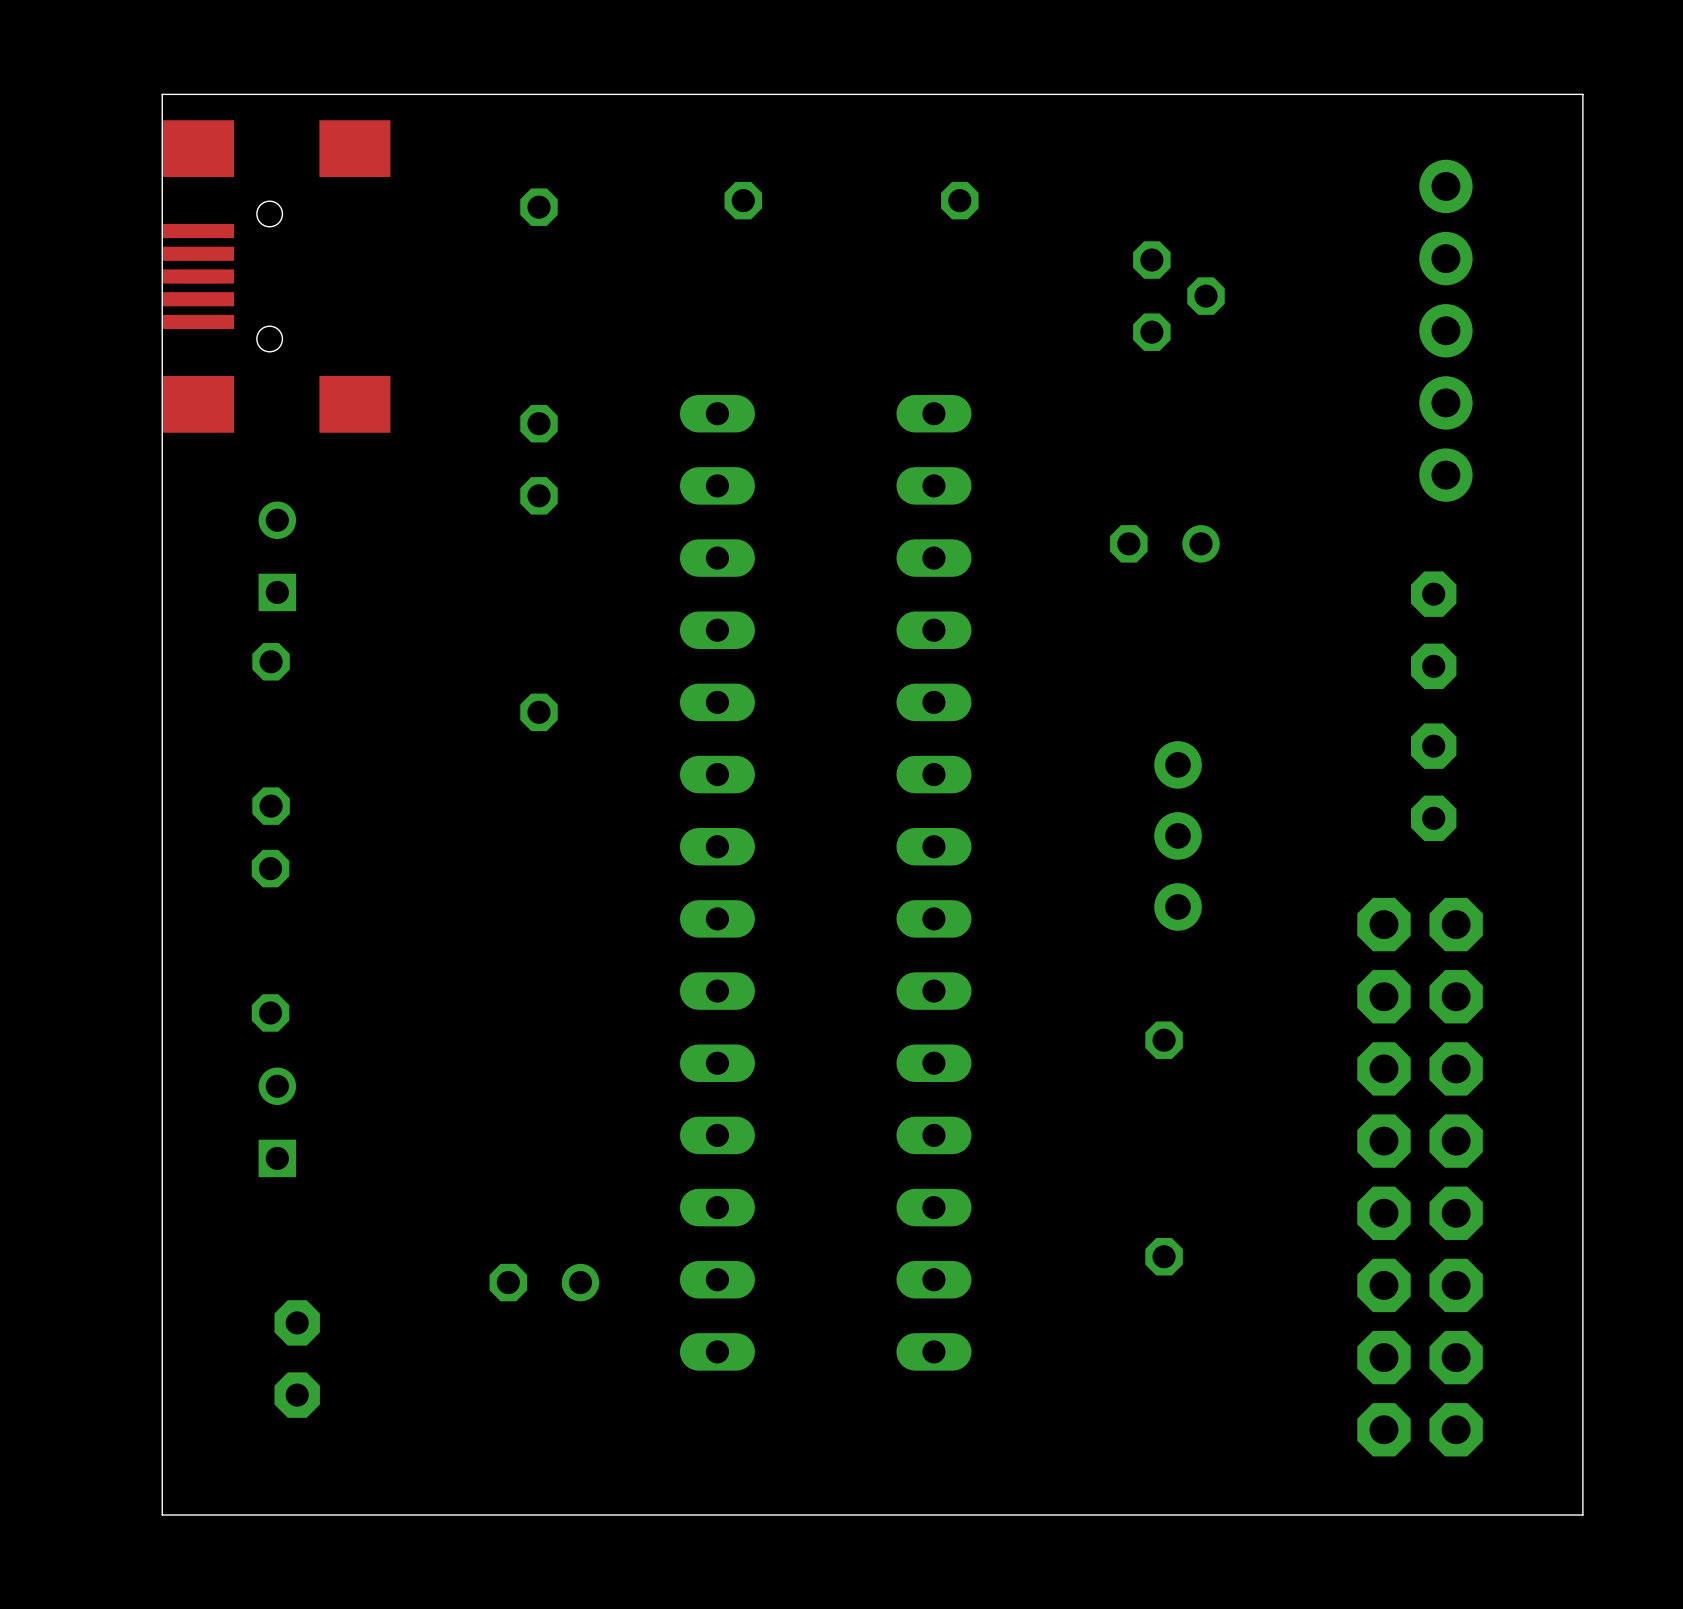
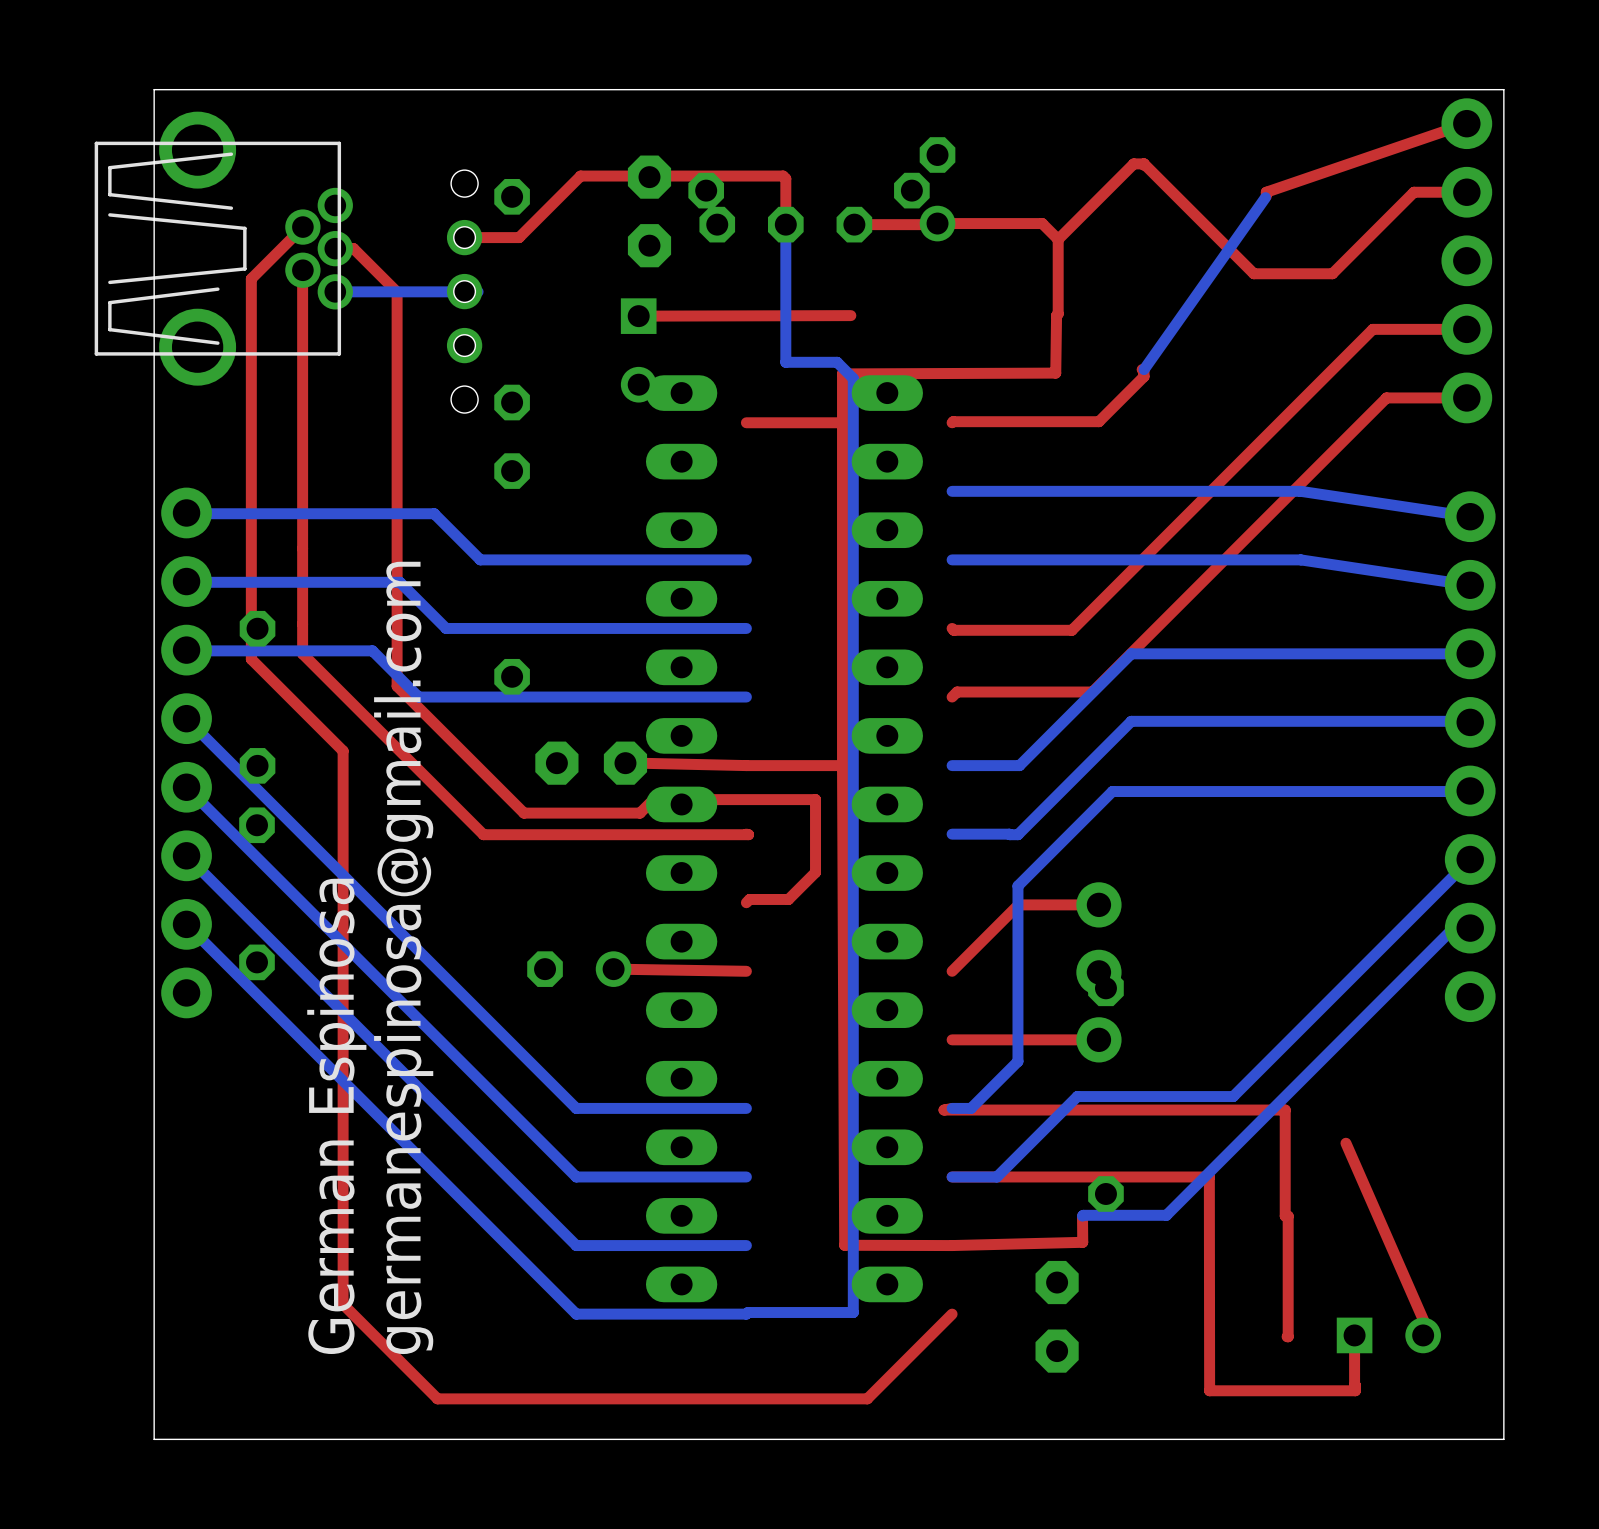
top track: none -> (1466, 123) (1266, 192) (1266, 196)
top track: none -> (1144, 163) (1253, 273) (1332, 273) (1413, 192) (1466, 192)
top track: none -> (1144, 163) (1133, 163) (1058, 239)
part: none -> (937, 189)
bottom track: none -> (1265, 197) (1144, 369)
part: none -> (649, 211)
top track: none -> (785, 224) (785, 178) (783, 176) (580, 176) (519, 237) (464, 237)
bottom track: none -> (785, 224) (785, 362) (837, 362) (853, 378) (853, 1312) (576, 1314) (186, 924)
part: none -> (785, 224)
top track: none -> (854, 224) (1042, 223) (1058, 239)
top track: none -> (302, 227) (251, 278) (251, 659) (343, 751) (343, 1304) (437, 1398) (867, 1398) (952, 1314)
top track: none -> (1058, 239) (1055, 373) (842, 373) (842, 765)
part: none -> (223, 248)
top track: none -> (335, 248) (353, 248) (397, 292) (397, 686) (523, 813) (640, 813) (653, 799) (815, 799) (815, 872) (788, 899) (749, 899) (746, 902)
part: (276, 276) -> none
top track: none -> (302, 270) (302, 653) (483, 834) (748, 834) (746, 834)
part: (1178, 296) -> none
part: none -> (464, 291)
bottom track: none -> (478, 291) (335, 291)
part position: (1445, 330) -> (1466, 260)
top track: none -> (850, 315) (638, 316)
top track: none -> (1466, 329) (1372, 329) (1071, 630) (953, 630) (952, 628)
part: none -> (638, 350)
top track: none -> (1142, 369) (1144, 369) (1144, 376) (1098, 421) (952, 422)
top track: none -> (1466, 397) (1386, 397) (1092, 692) (957, 692) (952, 697)
top track: none -> (842, 422) (746, 422)
bottom track: none -> (952, 491) (1300, 491) (1470, 516)
bottom track: none -> (186, 512) (434, 513) (480, 559) (746, 559)
part: (1164, 543) -> none
part: (277, 556) -> none
bottom track: none -> (952, 559) (1300, 559) (1470, 585)
bottom track: none -> (186, 581) (399, 582) (446, 628) (746, 628)
part: (1433, 630) -> none
bottom track: none -> (186, 650) (372, 650) (418, 697) (746, 697)
bottom track: none -> (1470, 653) (1131, 653) (1019, 765) (952, 765)
bottom track: none -> (186, 718) (576, 1108) (746, 1108)
bottom track: none -> (1470, 722) (1131, 721) (1017, 834) (952, 834)
part: (1433, 782) -> none
part: none -> (186, 752)
part: none -> (1470, 756)
top track: none -> (625, 762) (842, 765)
part: none -> (591, 763)
top track: none -> (842, 765) (844, 1245) (952, 1245) (1082, 1242) (1082, 1216)
bottom track: none -> (186, 787) (576, 1176) (746, 1176)
bottom track: none -> (1470, 790) (1112, 791) (1017, 885) (1017, 1061) (971, 1108) (952, 1108)
part position: (1178, 835) -> (1098, 972)
bottom track: none -> (186, 855) (576, 1245) (746, 1245)
bottom track: none -> (1470, 859) (1233, 1096) (1077, 1096) (996, 1176) (952, 1176)
top track: none -> (1098, 904) (1018, 904) (952, 971)
bottom track: none -> (1470, 928) (1453, 928) (1166, 1215) (1082, 1216)
text: none -> germanespinosa@gmail.com (403, 957)
top track: none -> (613, 969) (746, 971)
top track: none -> (1098, 1039) (952, 1039)
part: (277, 1122) -> none
top track: none -> (952, 1108) (944, 1110) (1285, 1110) (1285, 1216) (1288, 1216) (1287, 1336)
text: none -> German Espinosa (336, 1116)
part: (1420, 1177) -> none
top track: none -> (1345, 1143) (1430, 1335) (1423, 1335)
top track: none -> (952, 1176) (1209, 1176) (1209, 1390) (1355, 1390) (1354, 1335)
part position: (544, 1282) -> (579, 969)
part: (297, 1359) -> none
part: none -> (1057, 1316)
part: none -> (1388, 1335)

